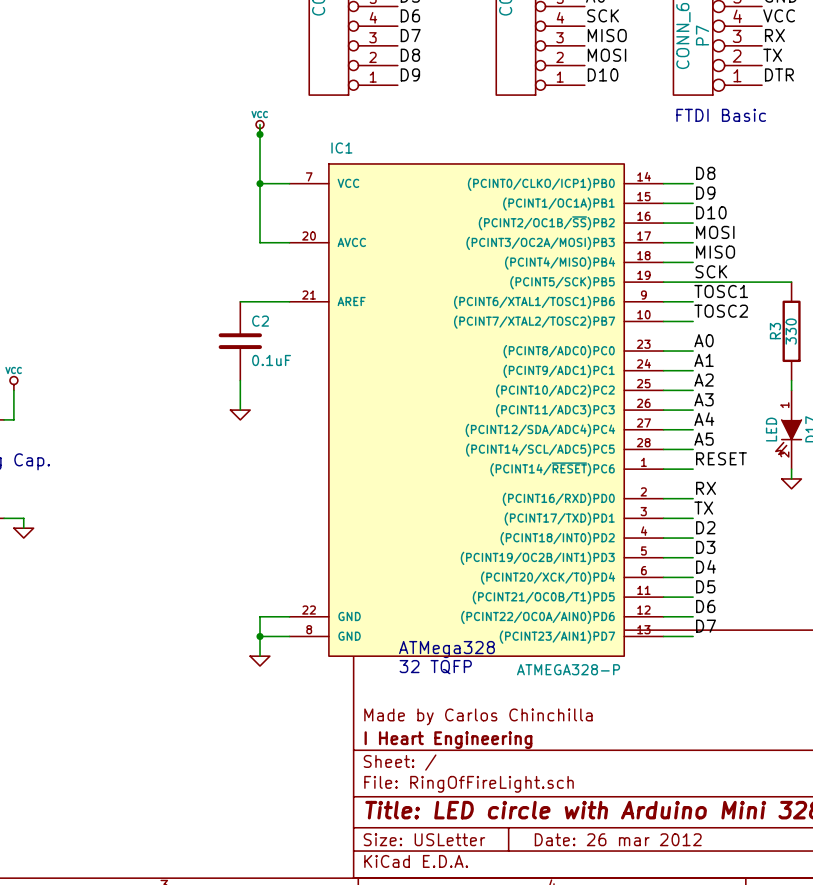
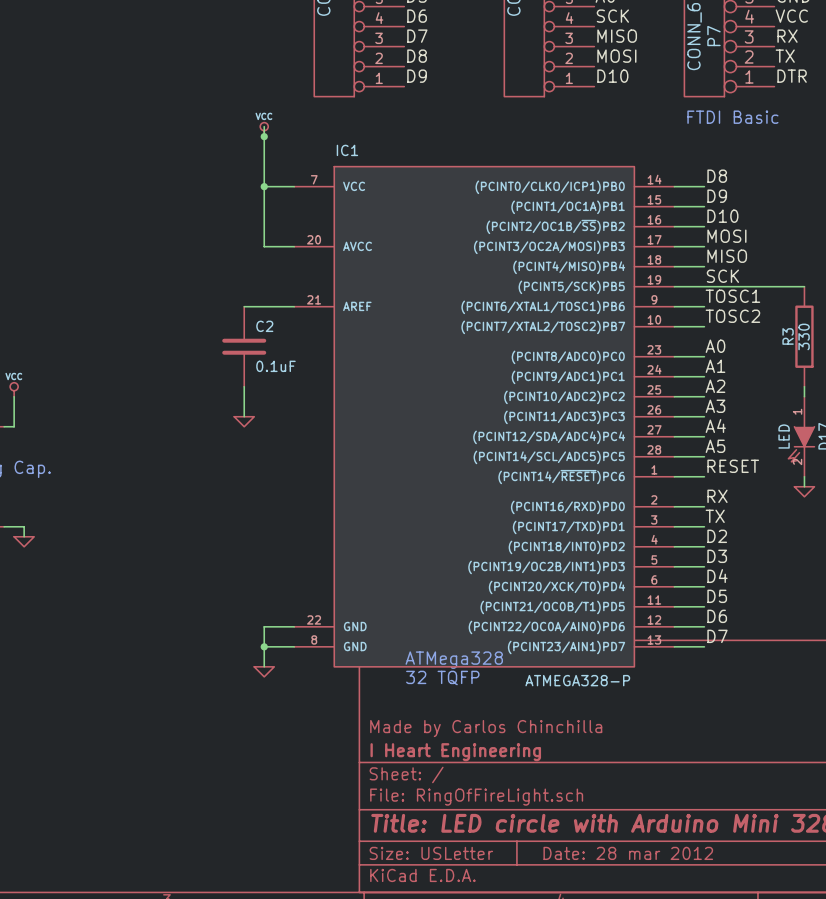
title block: Date: 26 mar 2012 (618, 839) -> Date: 28 mar 2012 (628, 853)

